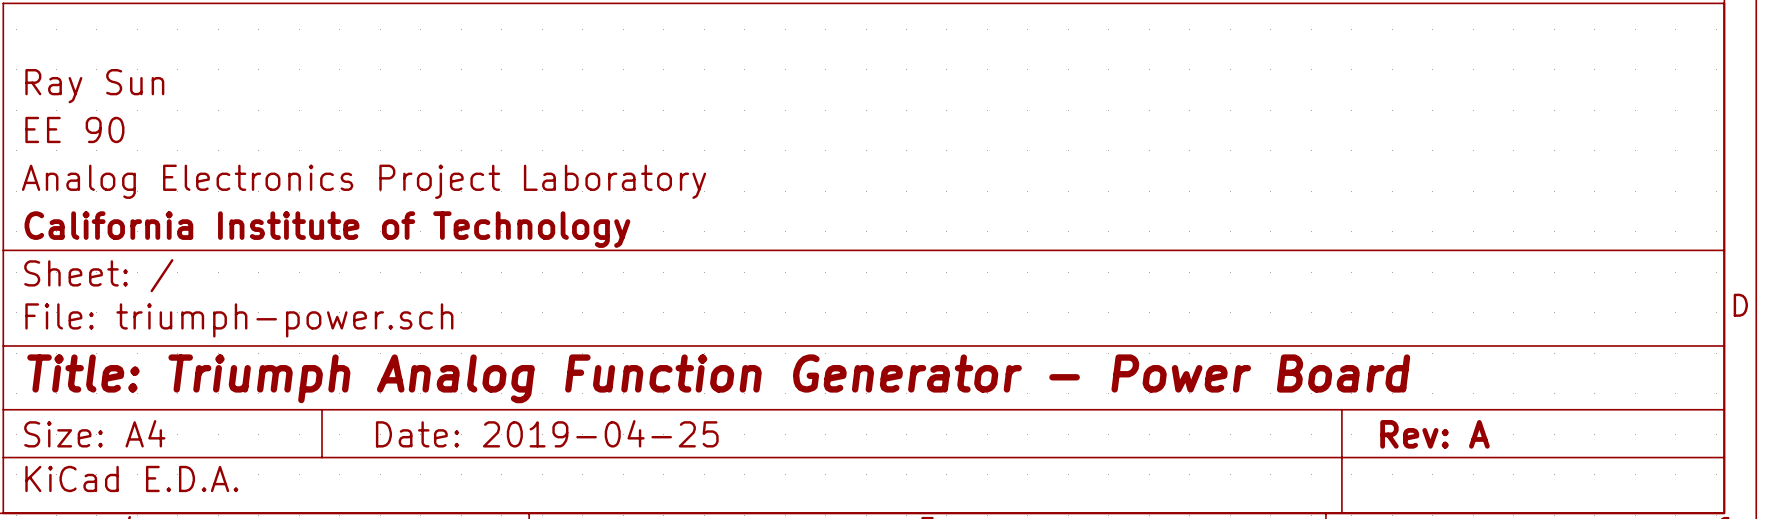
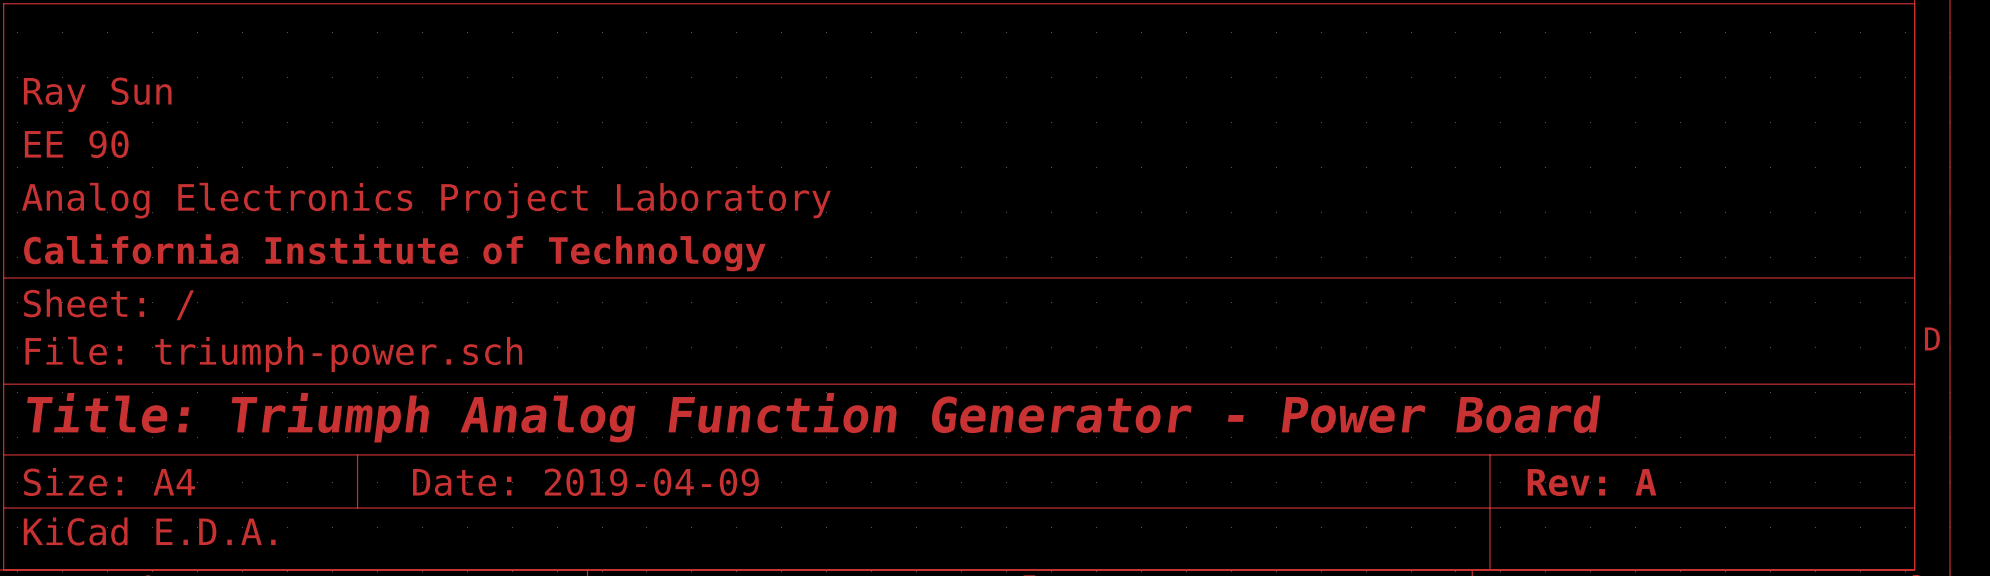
title block: Date: 2019-04-25 (547, 433) -> Date: 2019-04-09 (585, 482)

